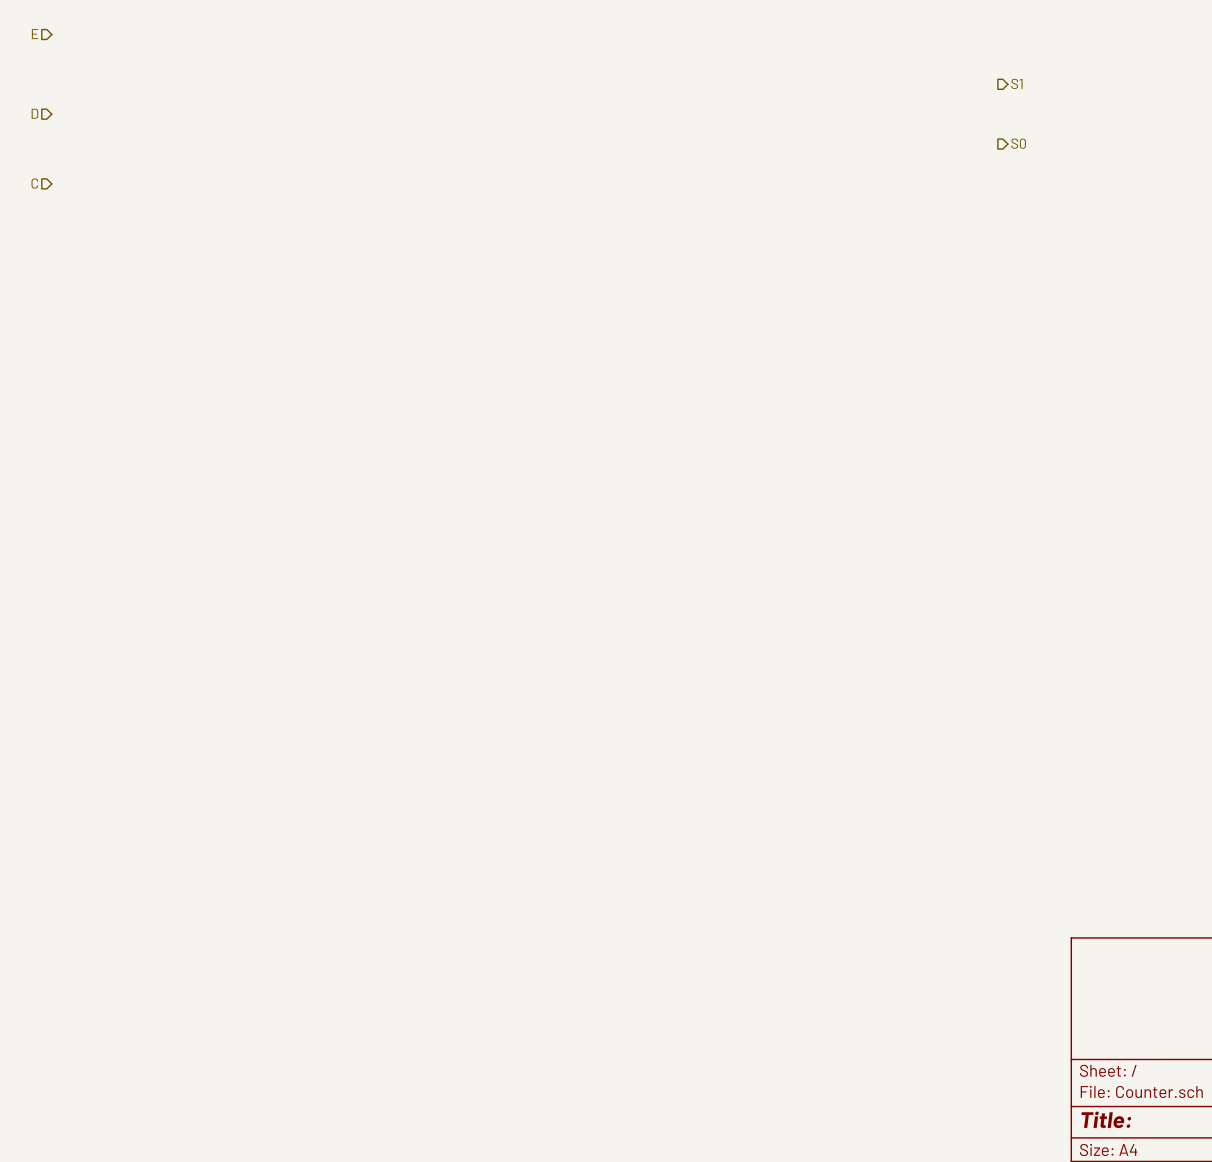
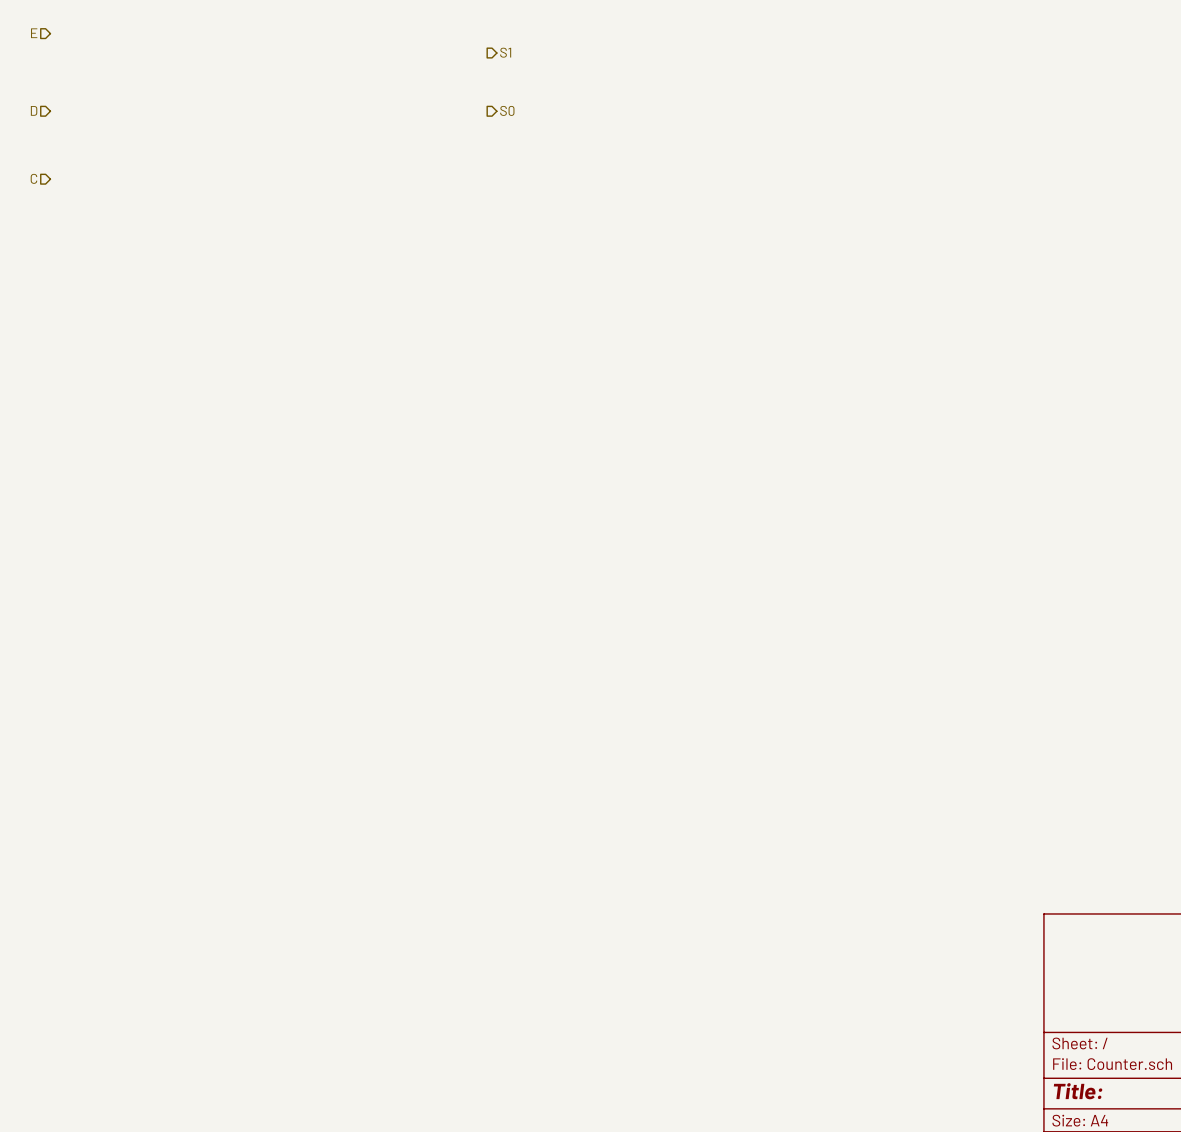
hierarchical label: none -> S1 (505, 52)
hierarchical label: S1 (1016, 83) -> none
hierarchical label: none -> S0 (507, 110)
hierarchical label: S0 (1018, 143) -> none

